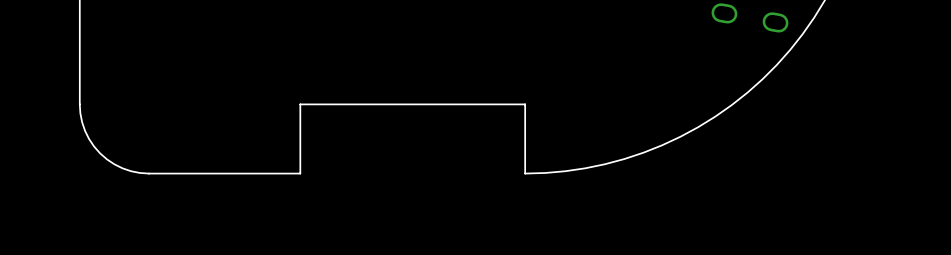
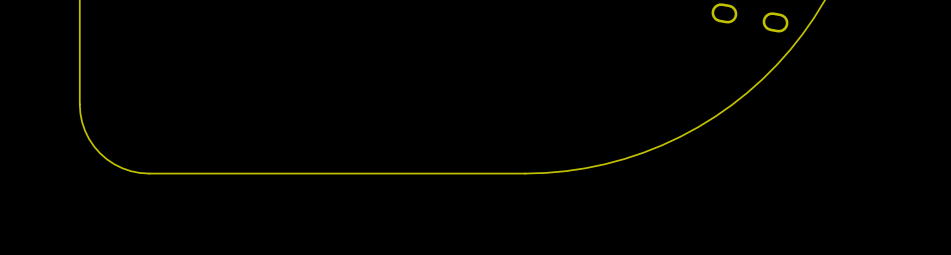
board edge: (525, 173) (525, 104) (300, 104) (300, 173) -> (525, 173) (300, 173)

